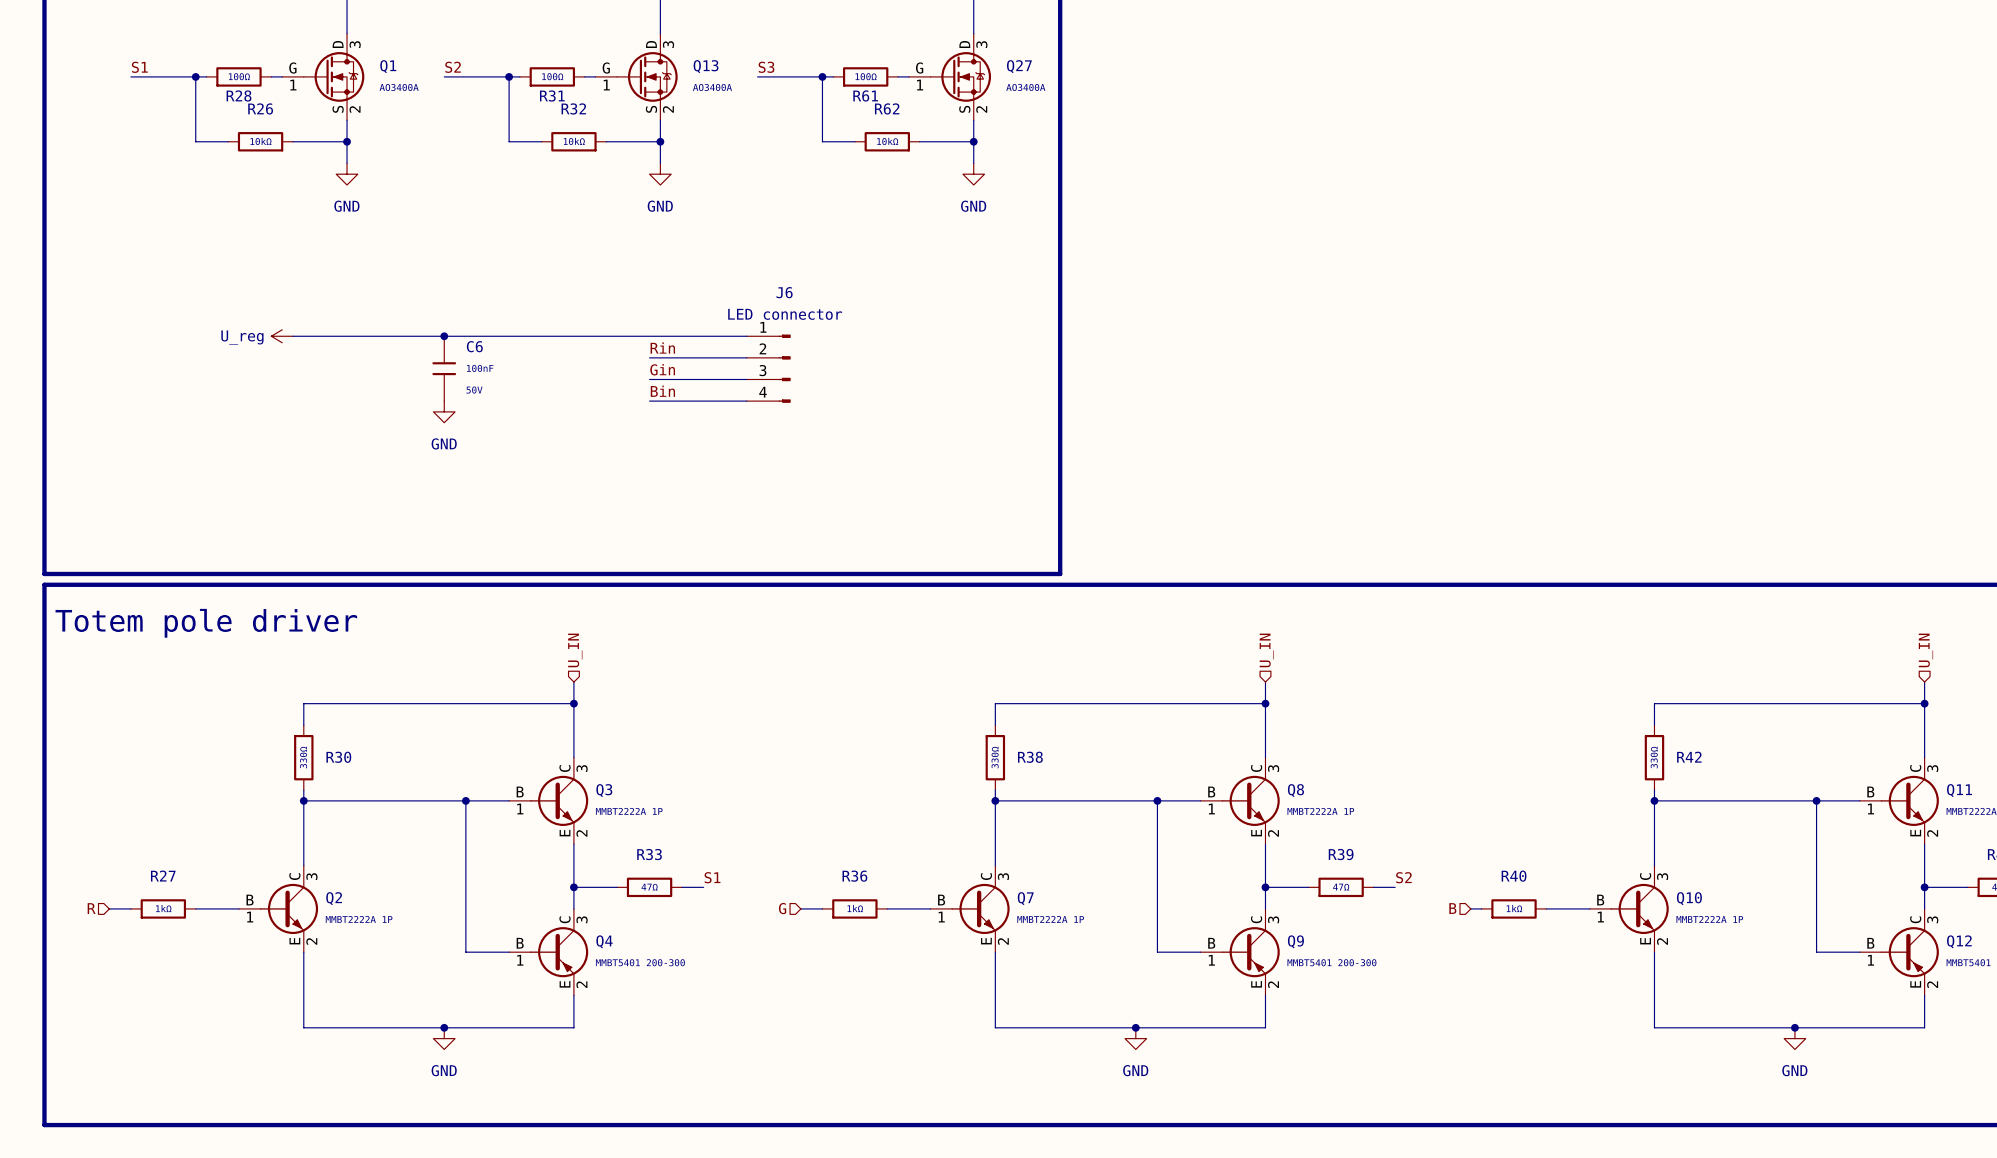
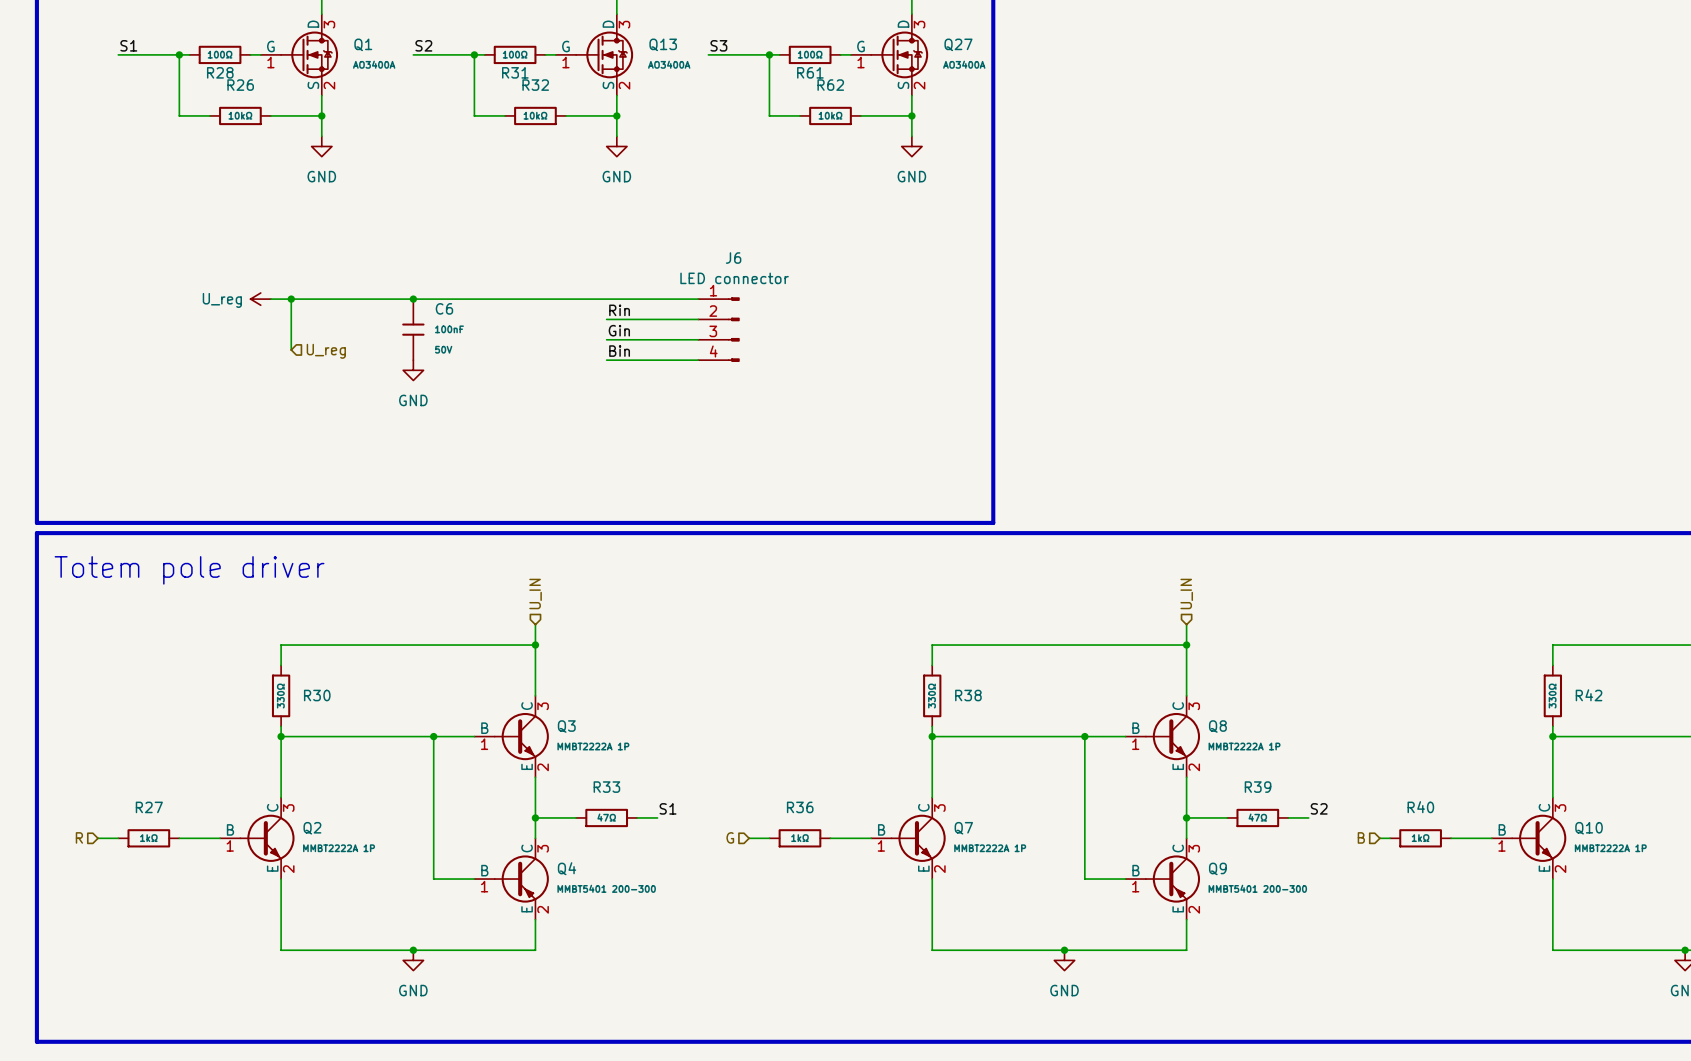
wire: none -> (291, 299) (291, 349)
junction: none -> (291, 299)
hierarchical label: none -> U_reg (326, 351)

